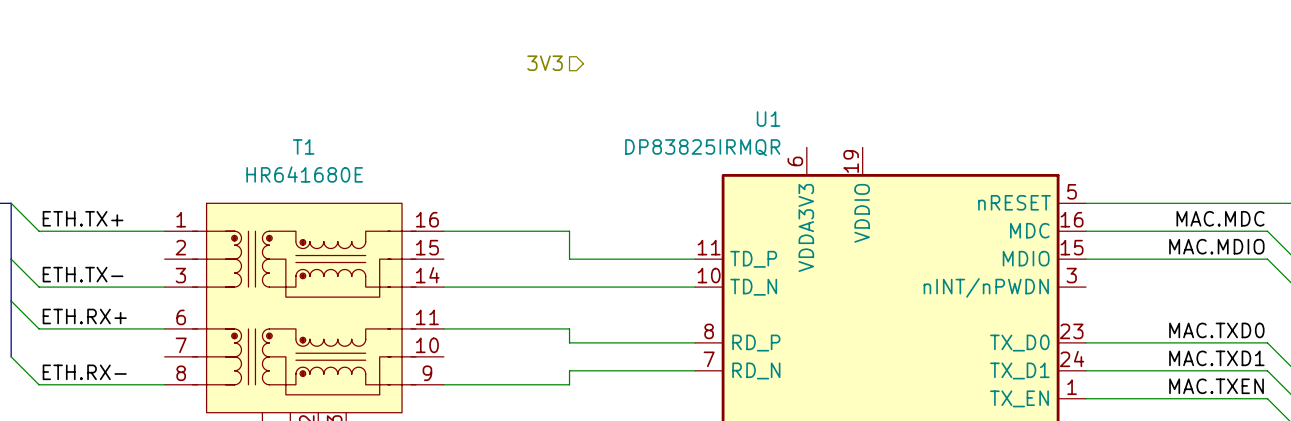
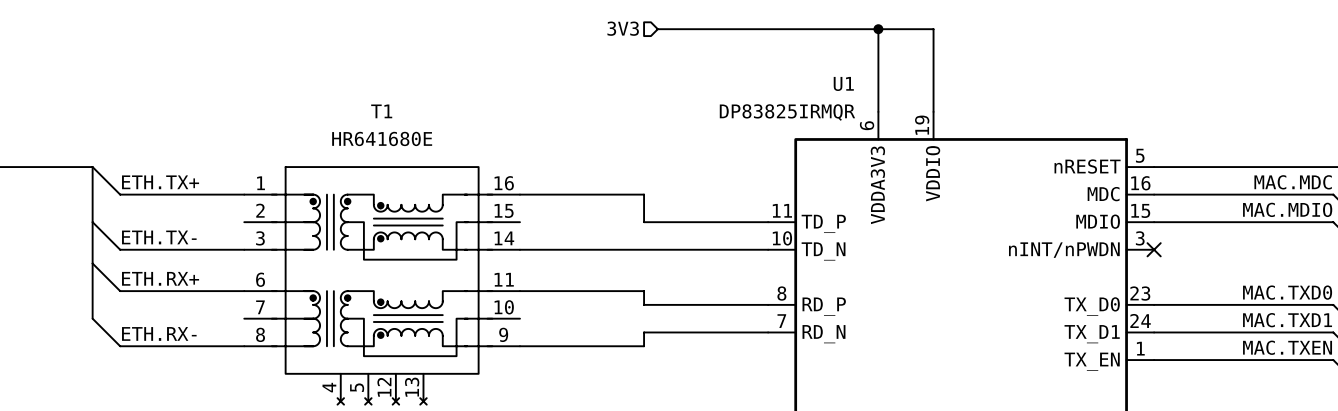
wire: none -> (657, 29) (933, 29) (933, 111)
wire: none -> (878, 29) (878, 111)
junction: none -> (878, 29)
no-connect mark: none -> (1154, 249)

